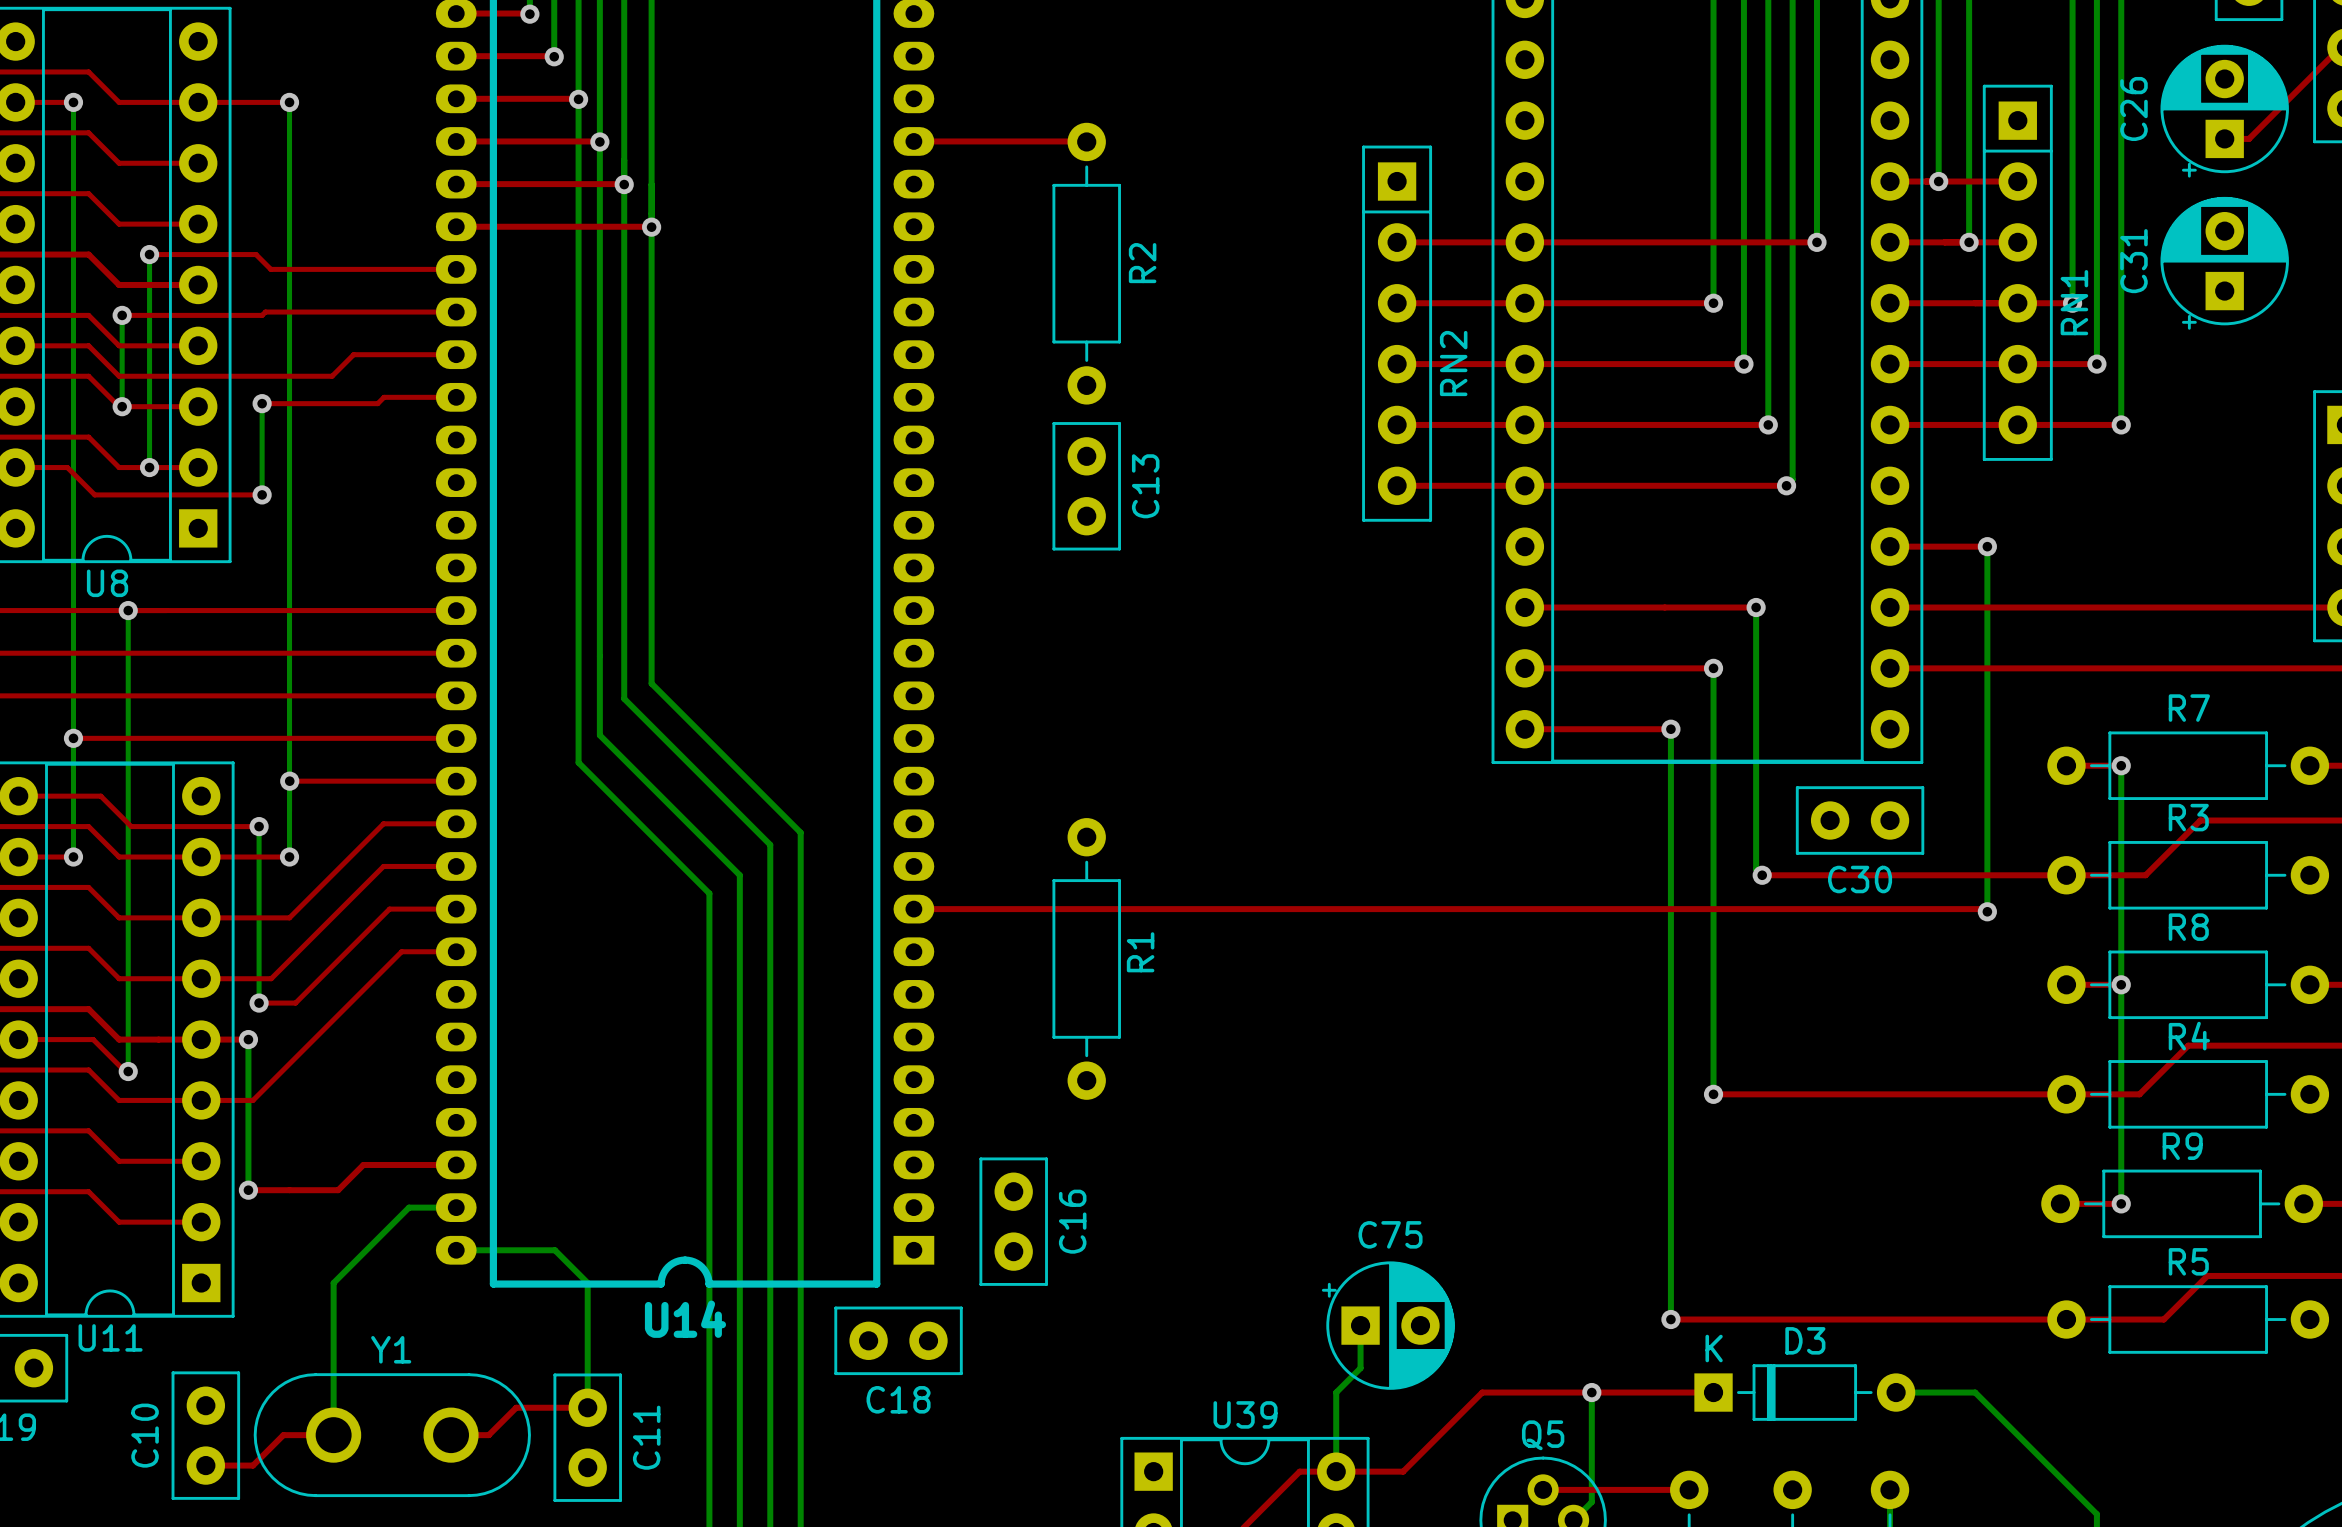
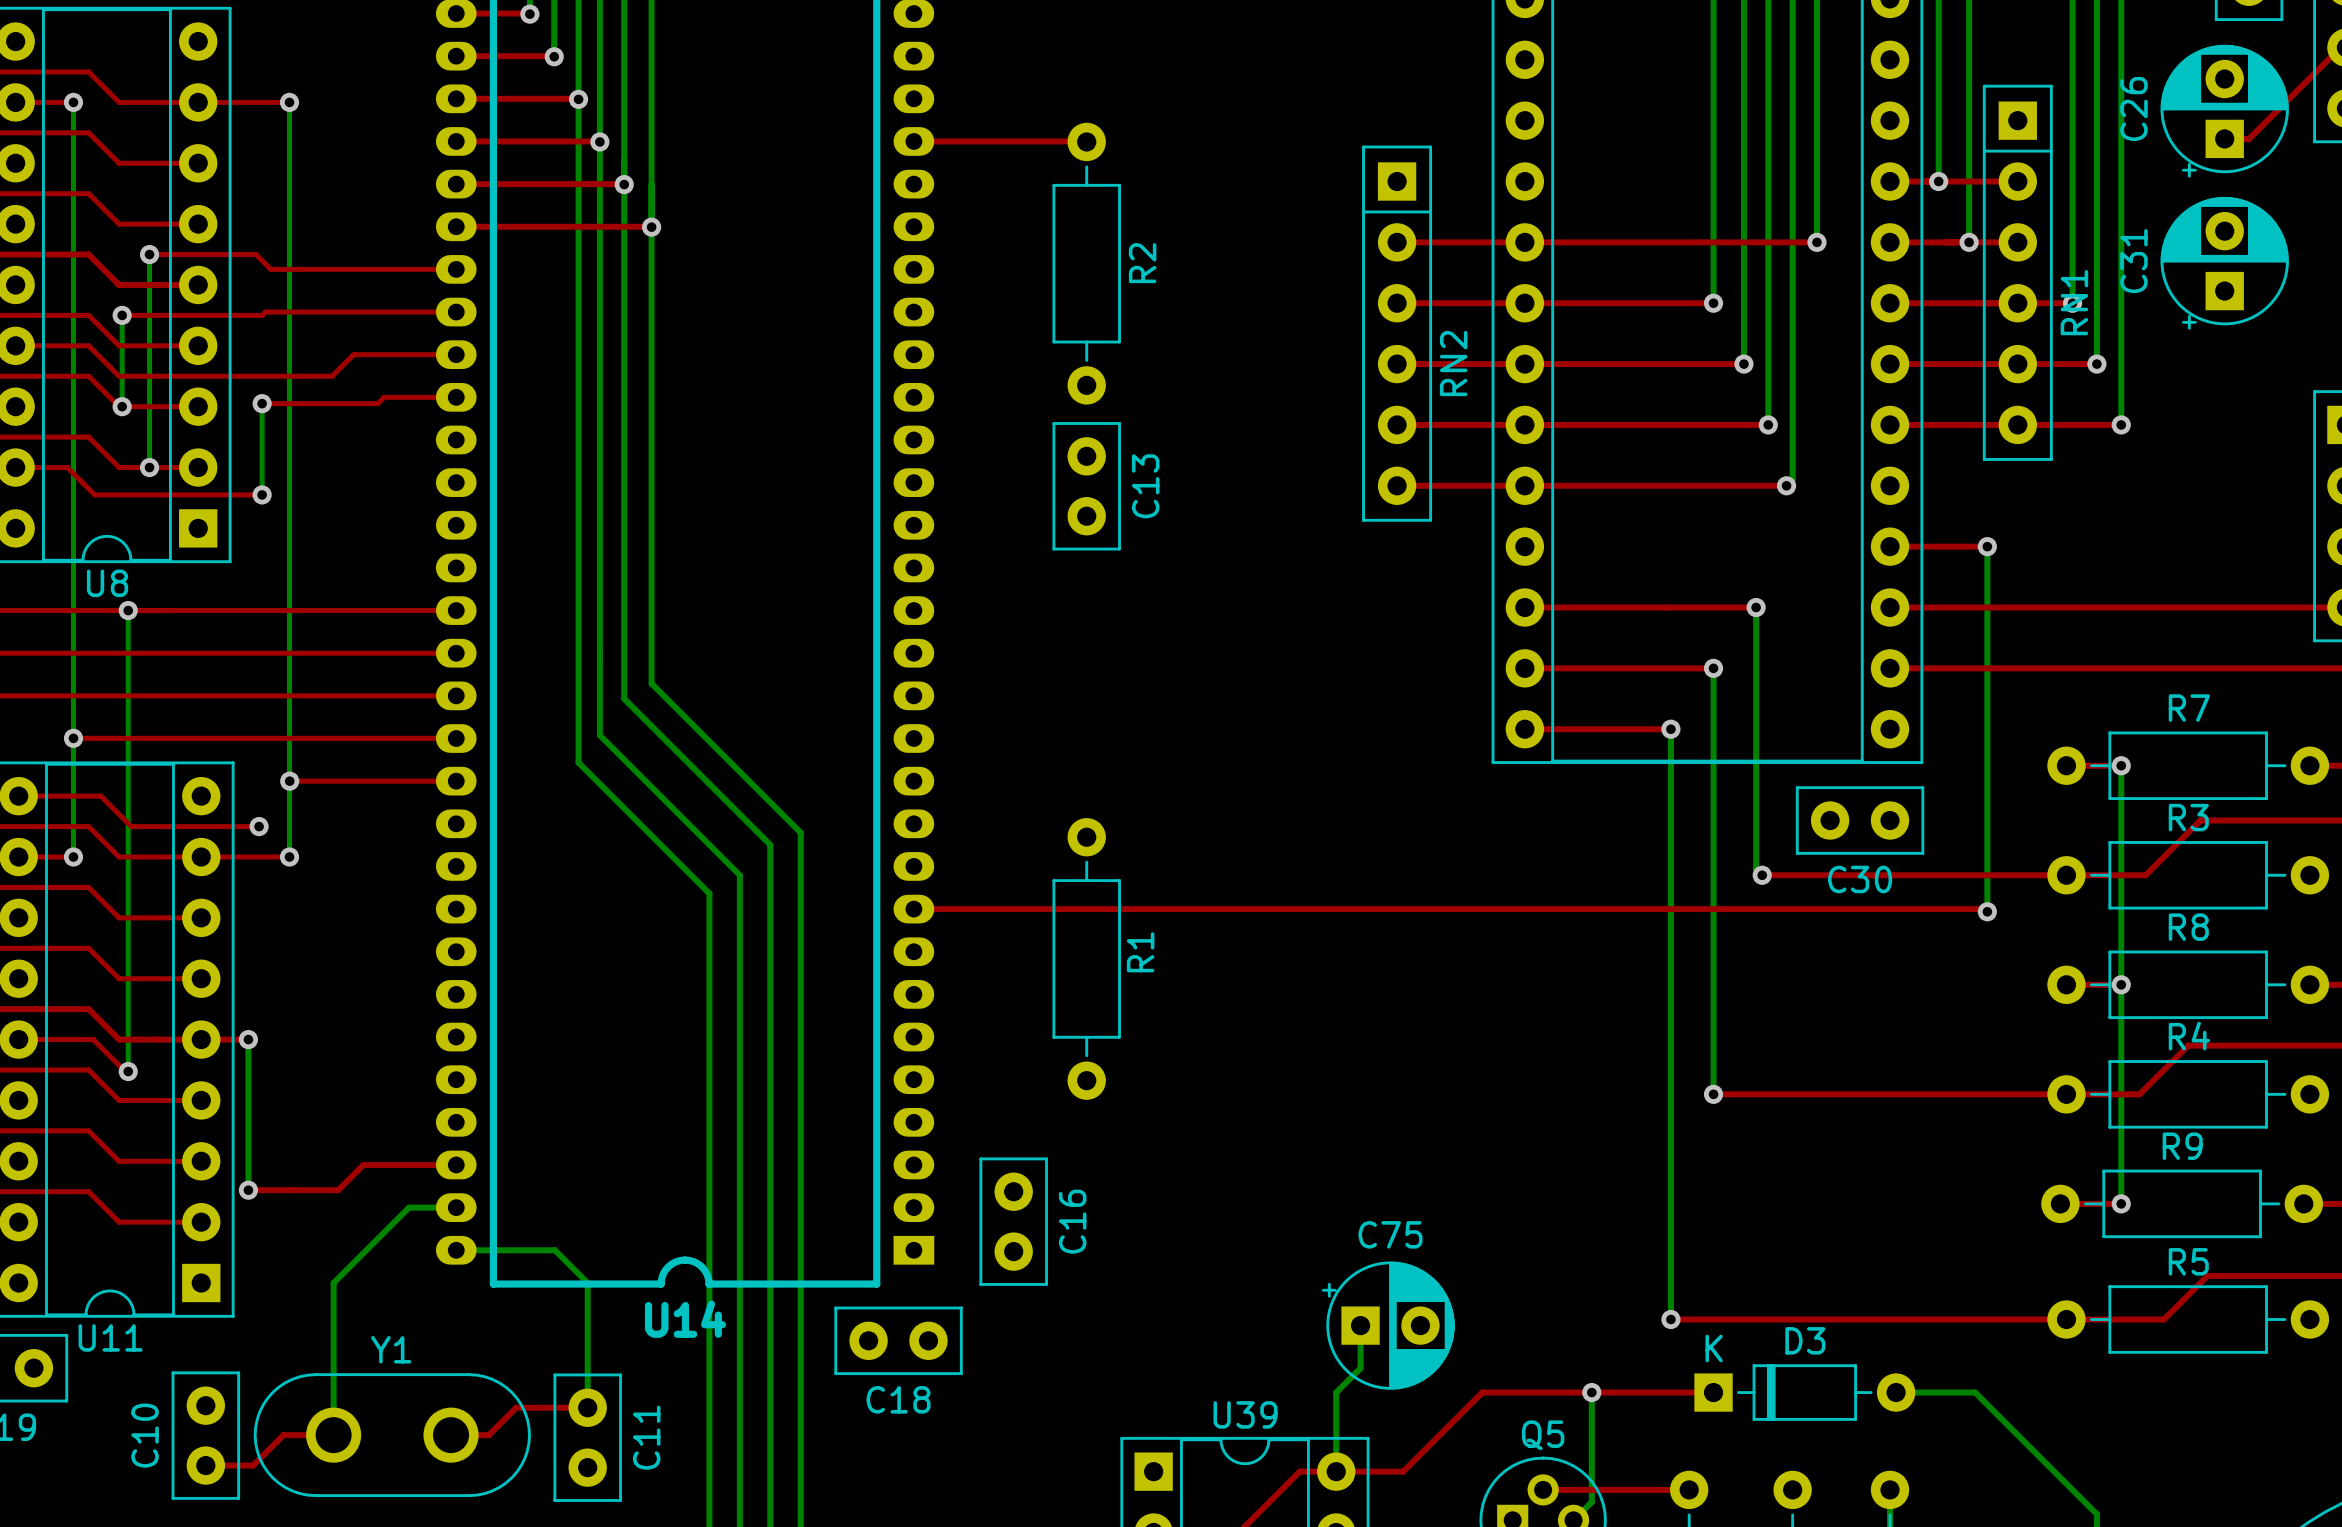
top track: (456, 823) (383, 823) (289, 917) (201, 917) -> none
bottom track: (259, 826) (259, 1003) -> none
top track: (456, 866) (383, 866) (271, 978) (201, 978) -> none
top track: (456, 909) (389, 909) (295, 1003) (259, 1003) -> none
top track: (456, 951) (401, 951) (253, 1100) (201, 1100) -> none
via: (259, 1003) -> none

